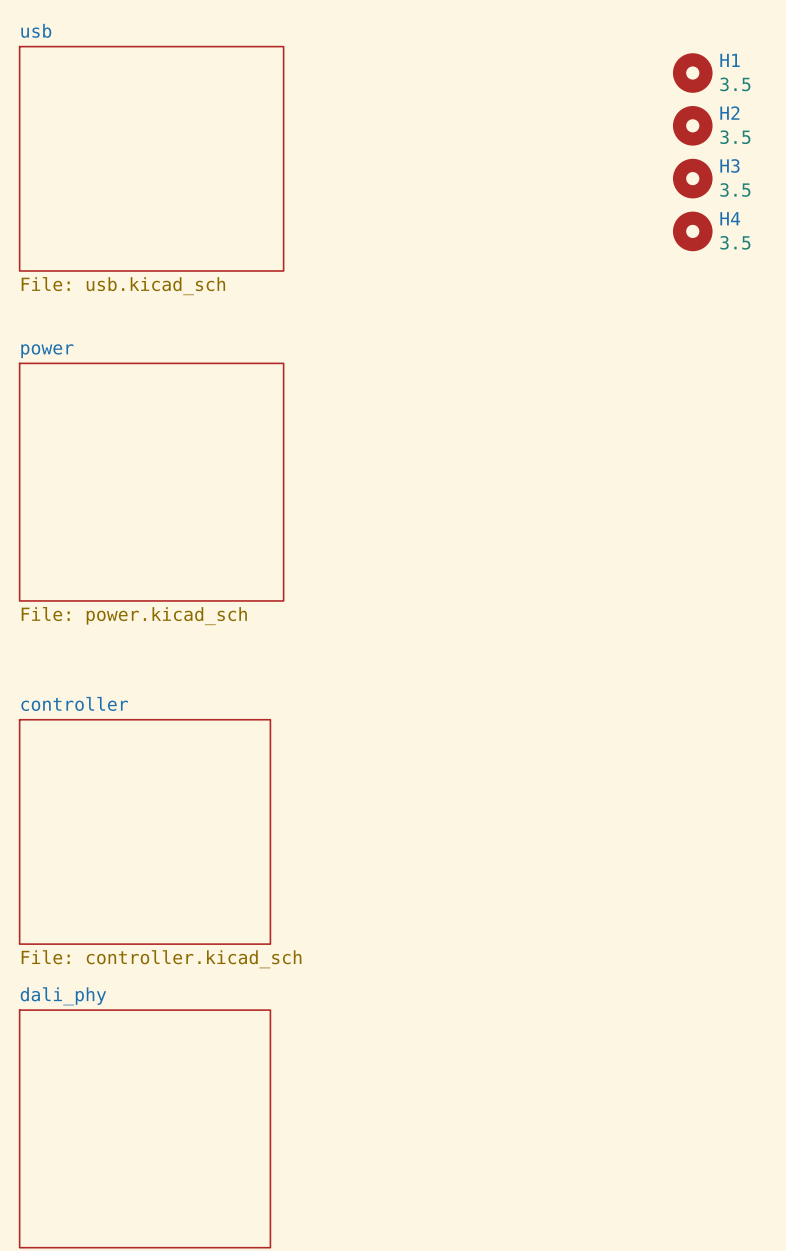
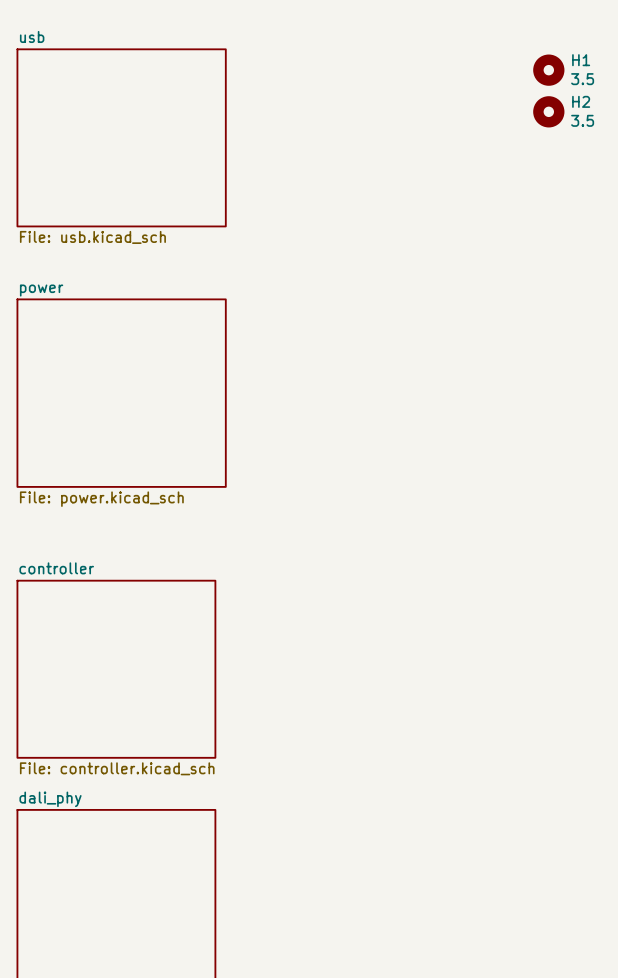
H3: 3.5 (692, 178) -> none
H4: 3.5 (692, 231) -> none

